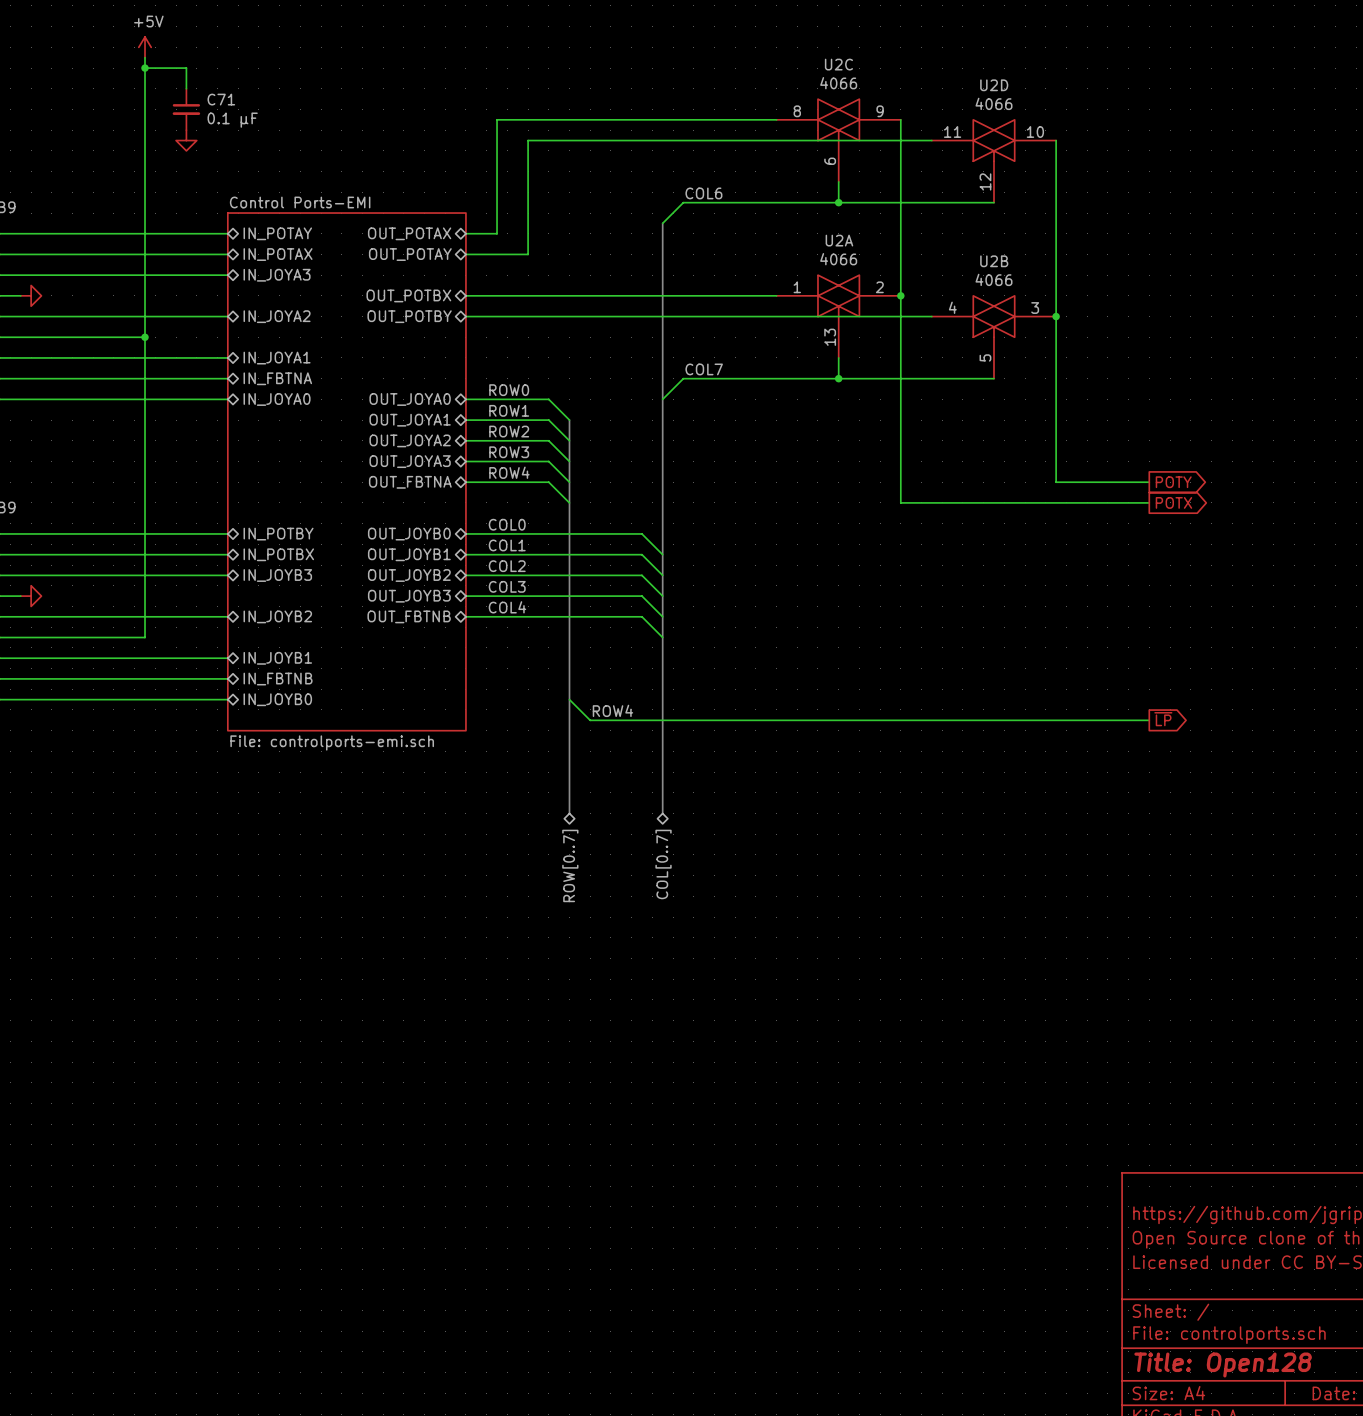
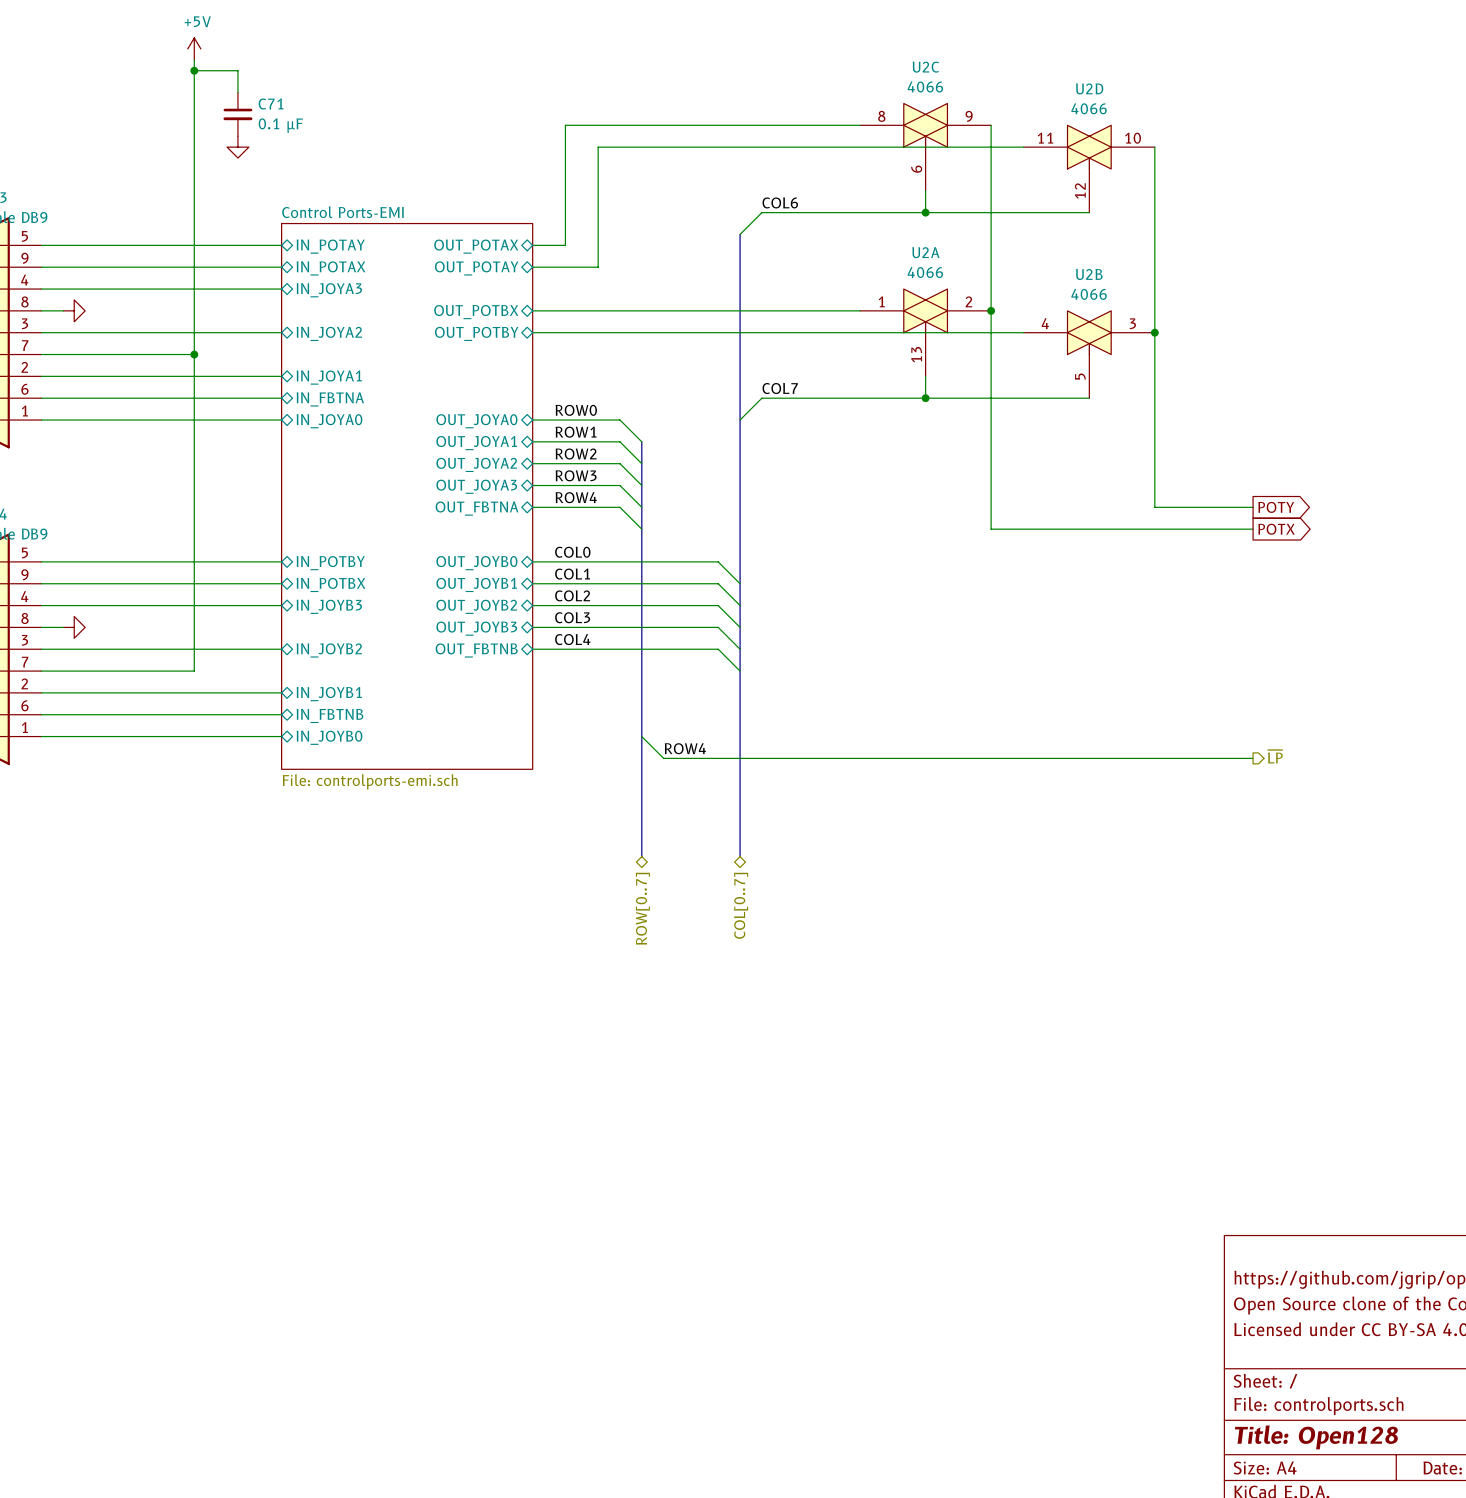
hierarchical label: none -> ~{LP} (1275, 756)
global label: ~{LP} (1163, 719) -> none

